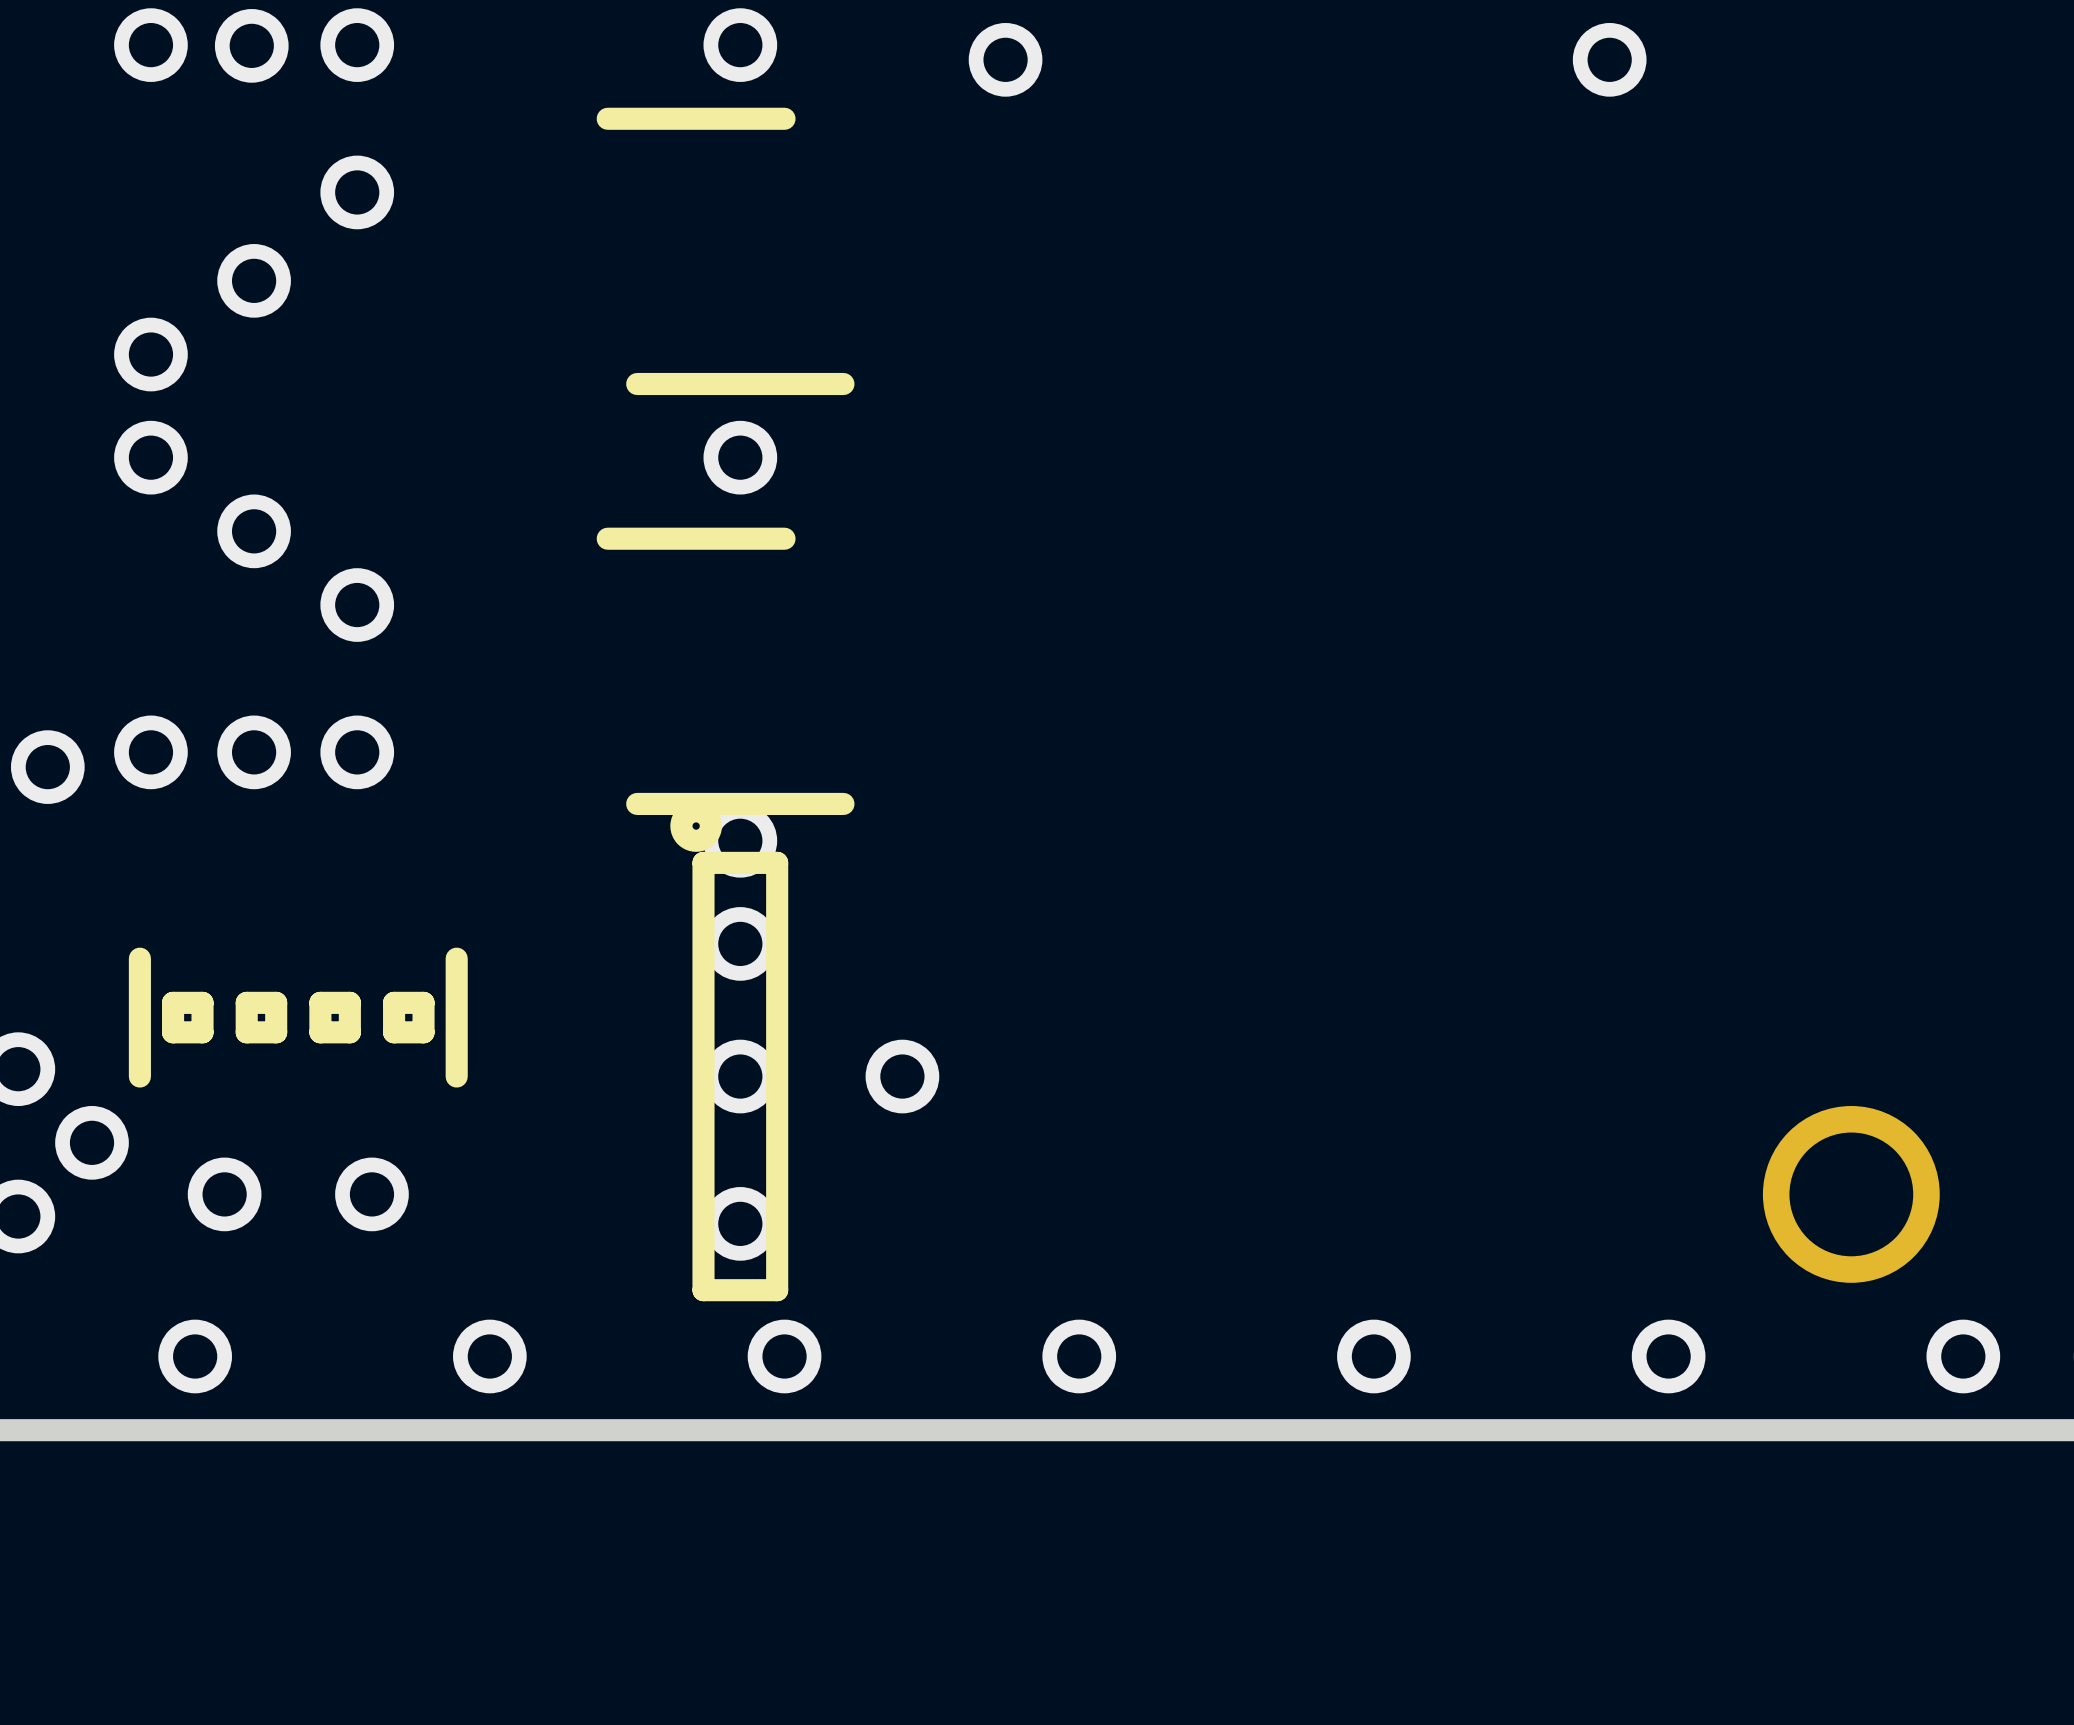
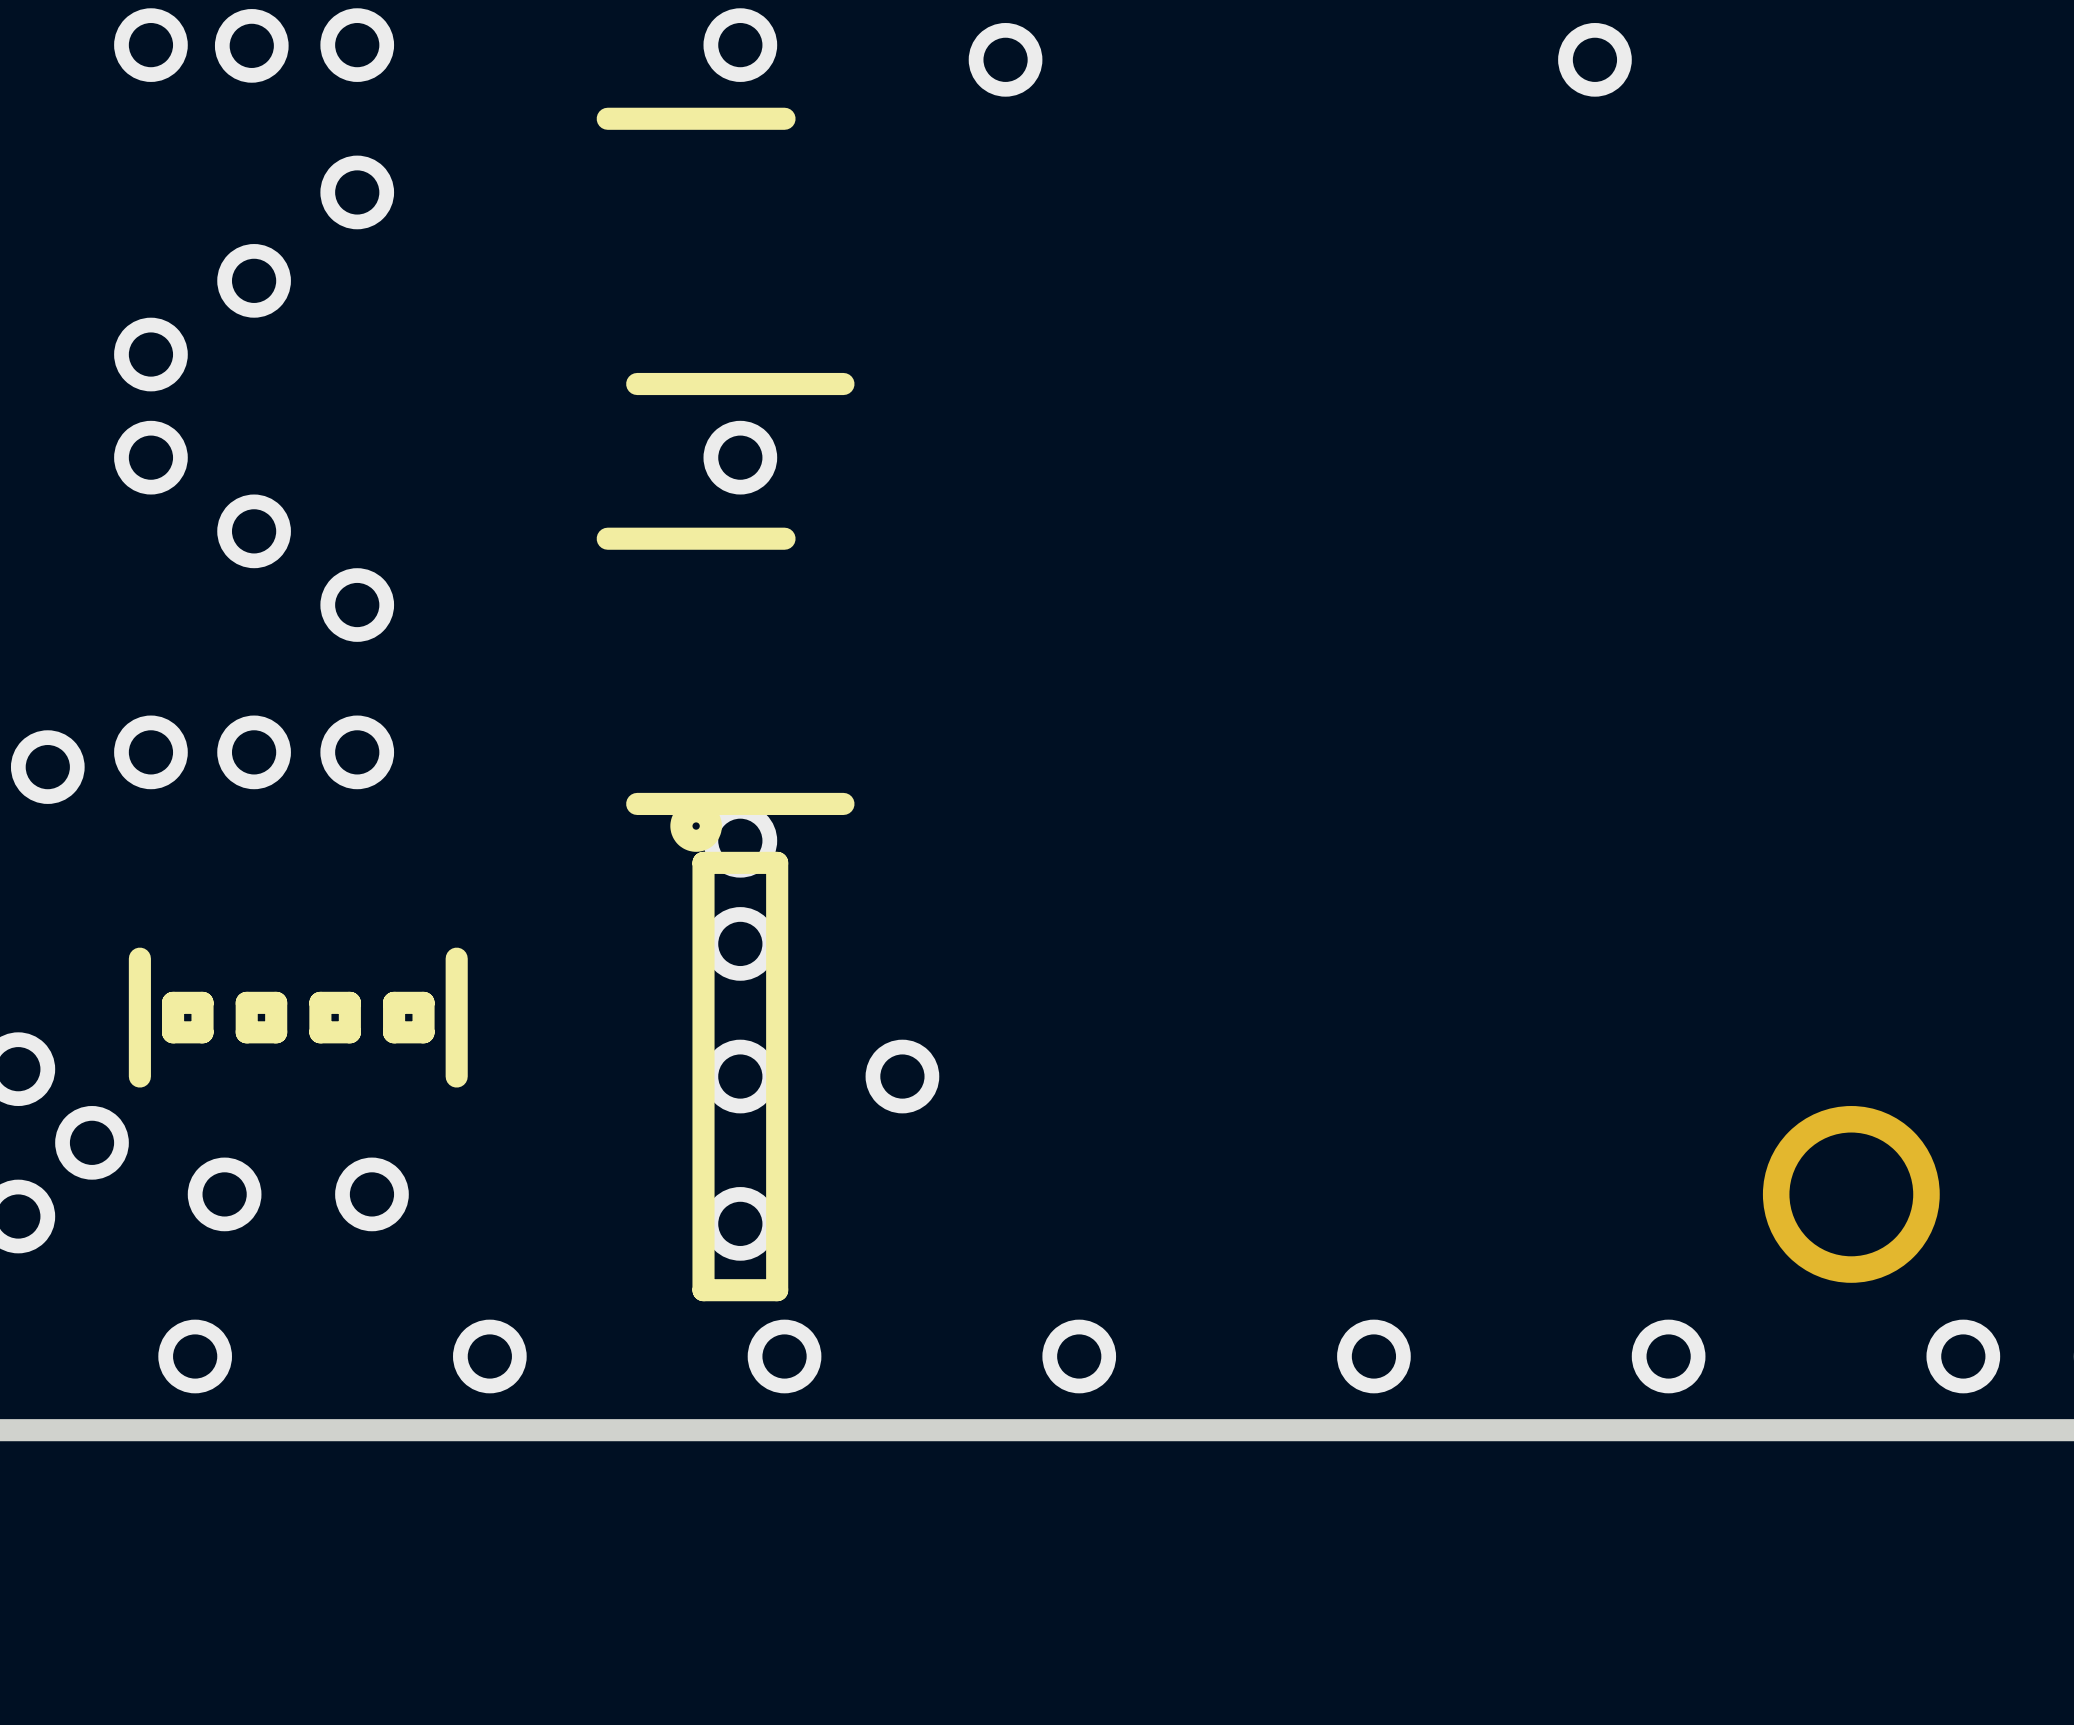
via position: (1609, 59) -> (1594, 59)

